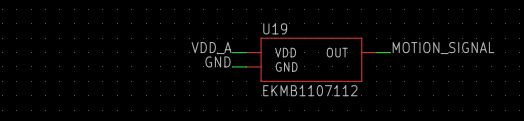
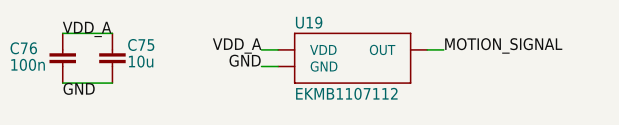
label: none -> VDD_A (87, 29)
wire: none -> (62, 33) (112, 33)
C76: none -> 100n (62, 58)
C75: none -> 10u (112, 58)
wire: none -> (62, 83) (112, 83)
label: none -> GND (79, 88)

